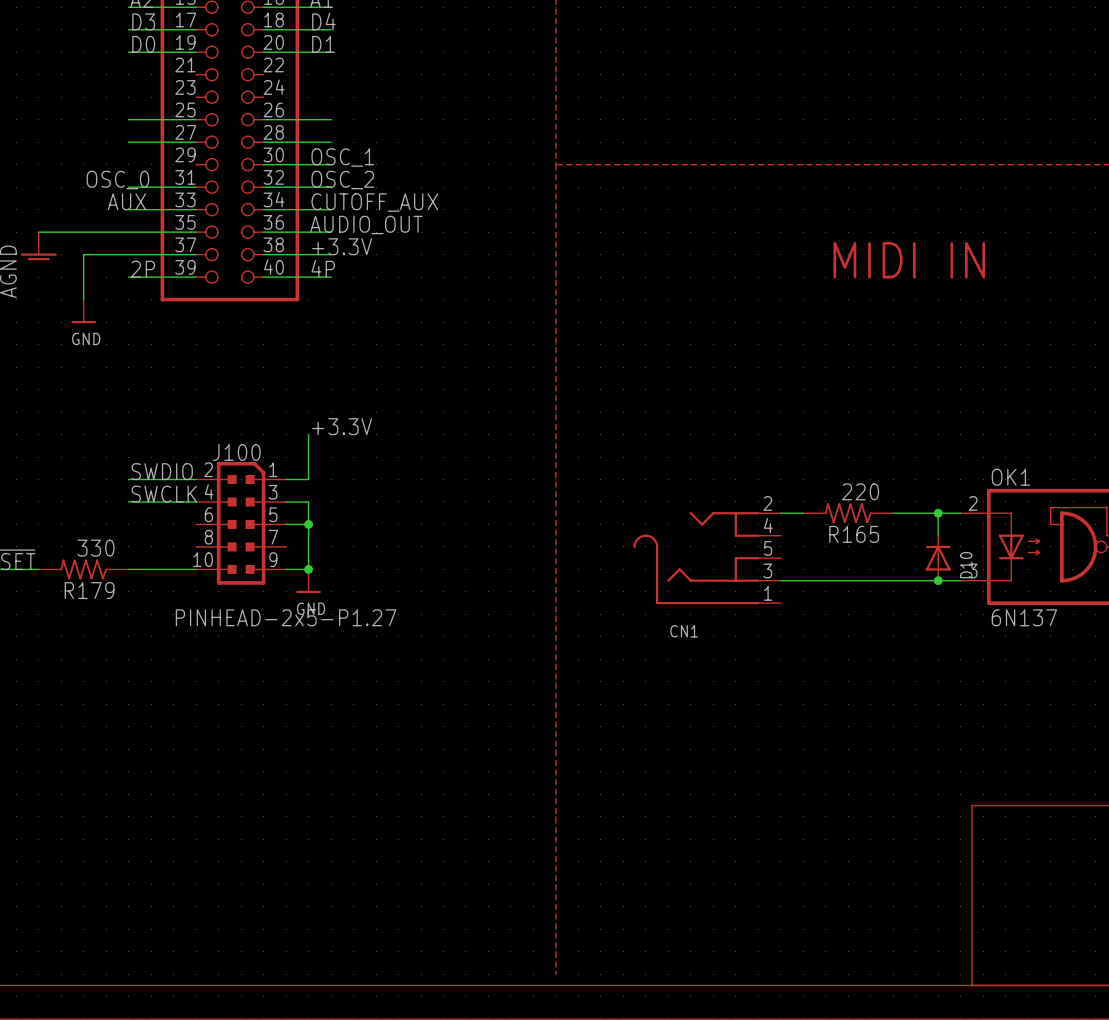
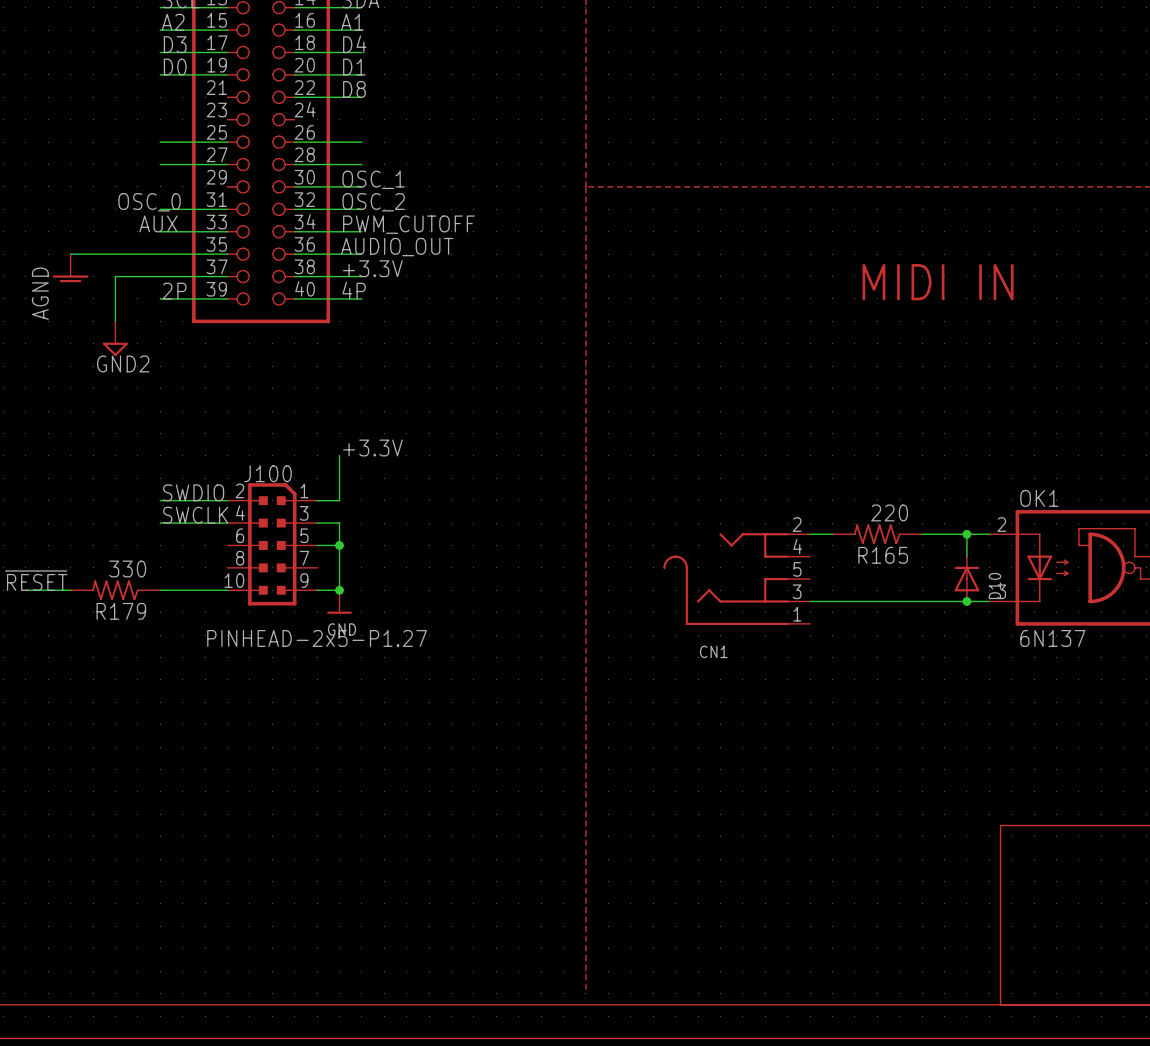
label: none -> D8 (354, 89)
wire: none -> (294, 97) (361, 97)
label: CUTOFF_AUX (374, 202) -> PWM_CUTOFF (408, 224)
power symbol: GND (83, 311) -> GND2 (115, 338)

